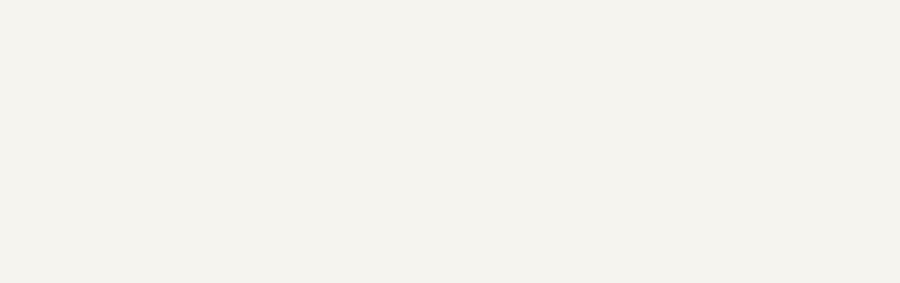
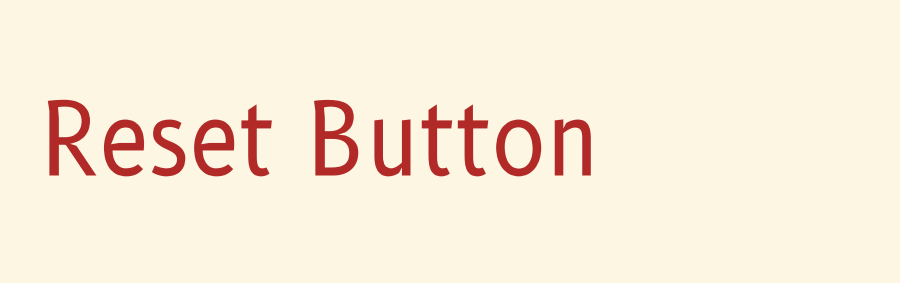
text: none -> Reset Button (319, 138)

